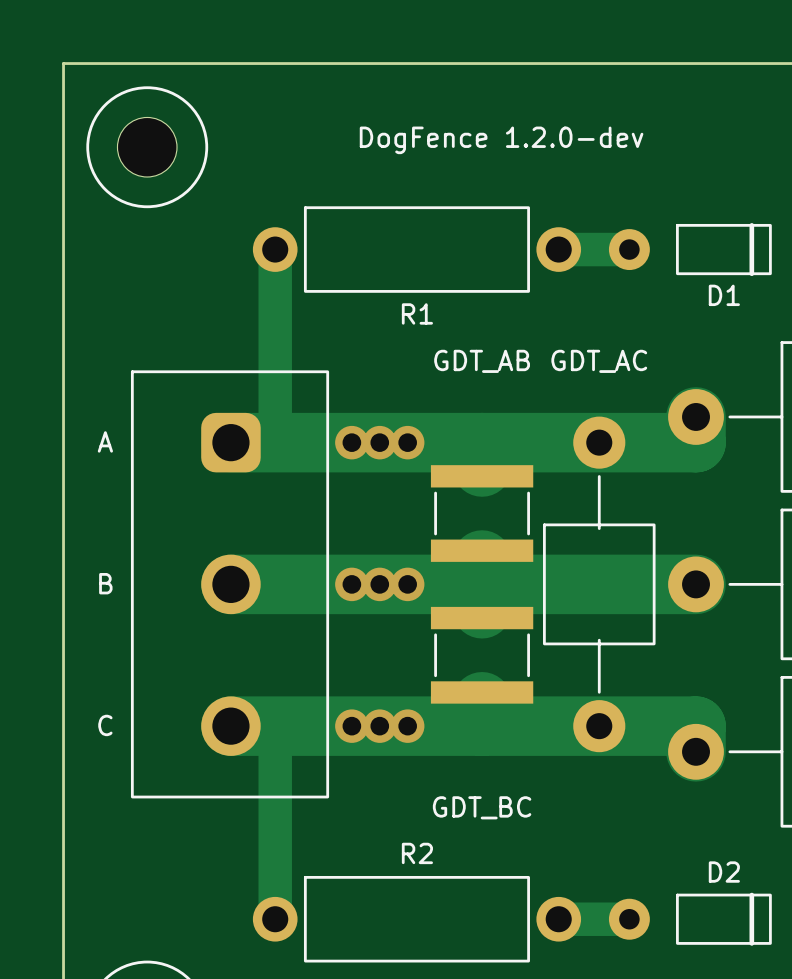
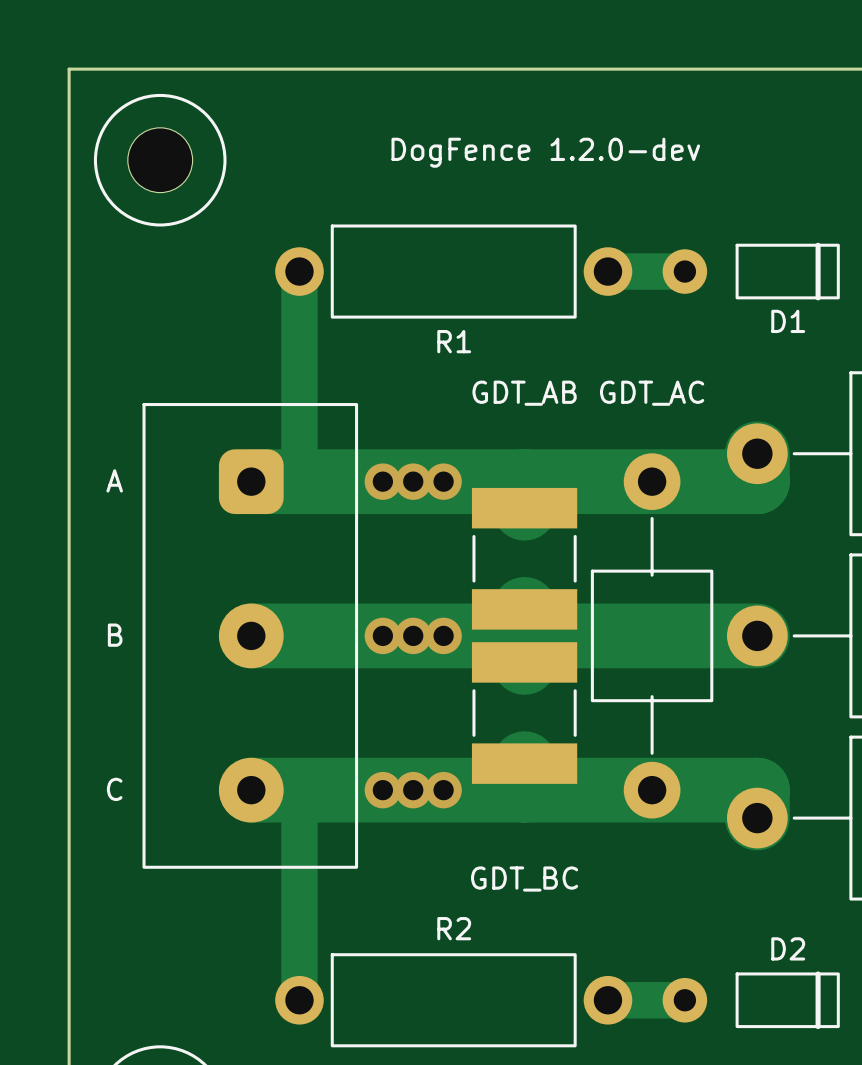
part footprint: [130, 370, 330, 799] -> [142, 403, 359, 869]
GDT_AB footprint: [430, 465, 534, 562] -> [471, 487, 578, 630]
GDT_BC footprint: [430, 606, 534, 704] -> [471, 642, 578, 784]

